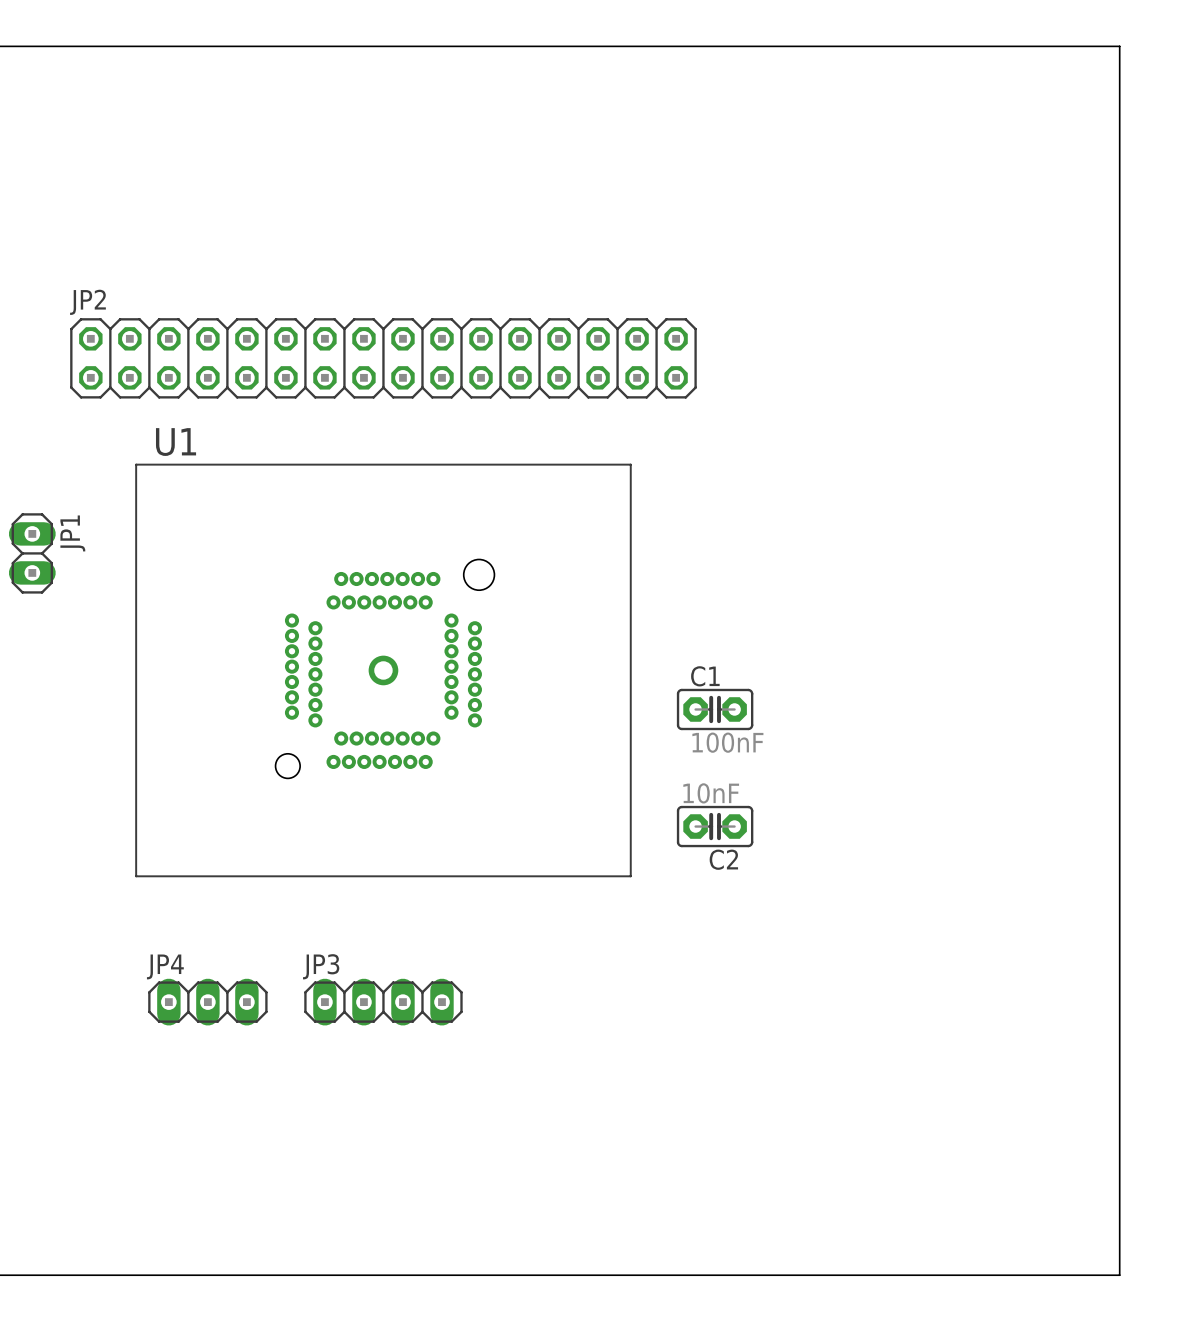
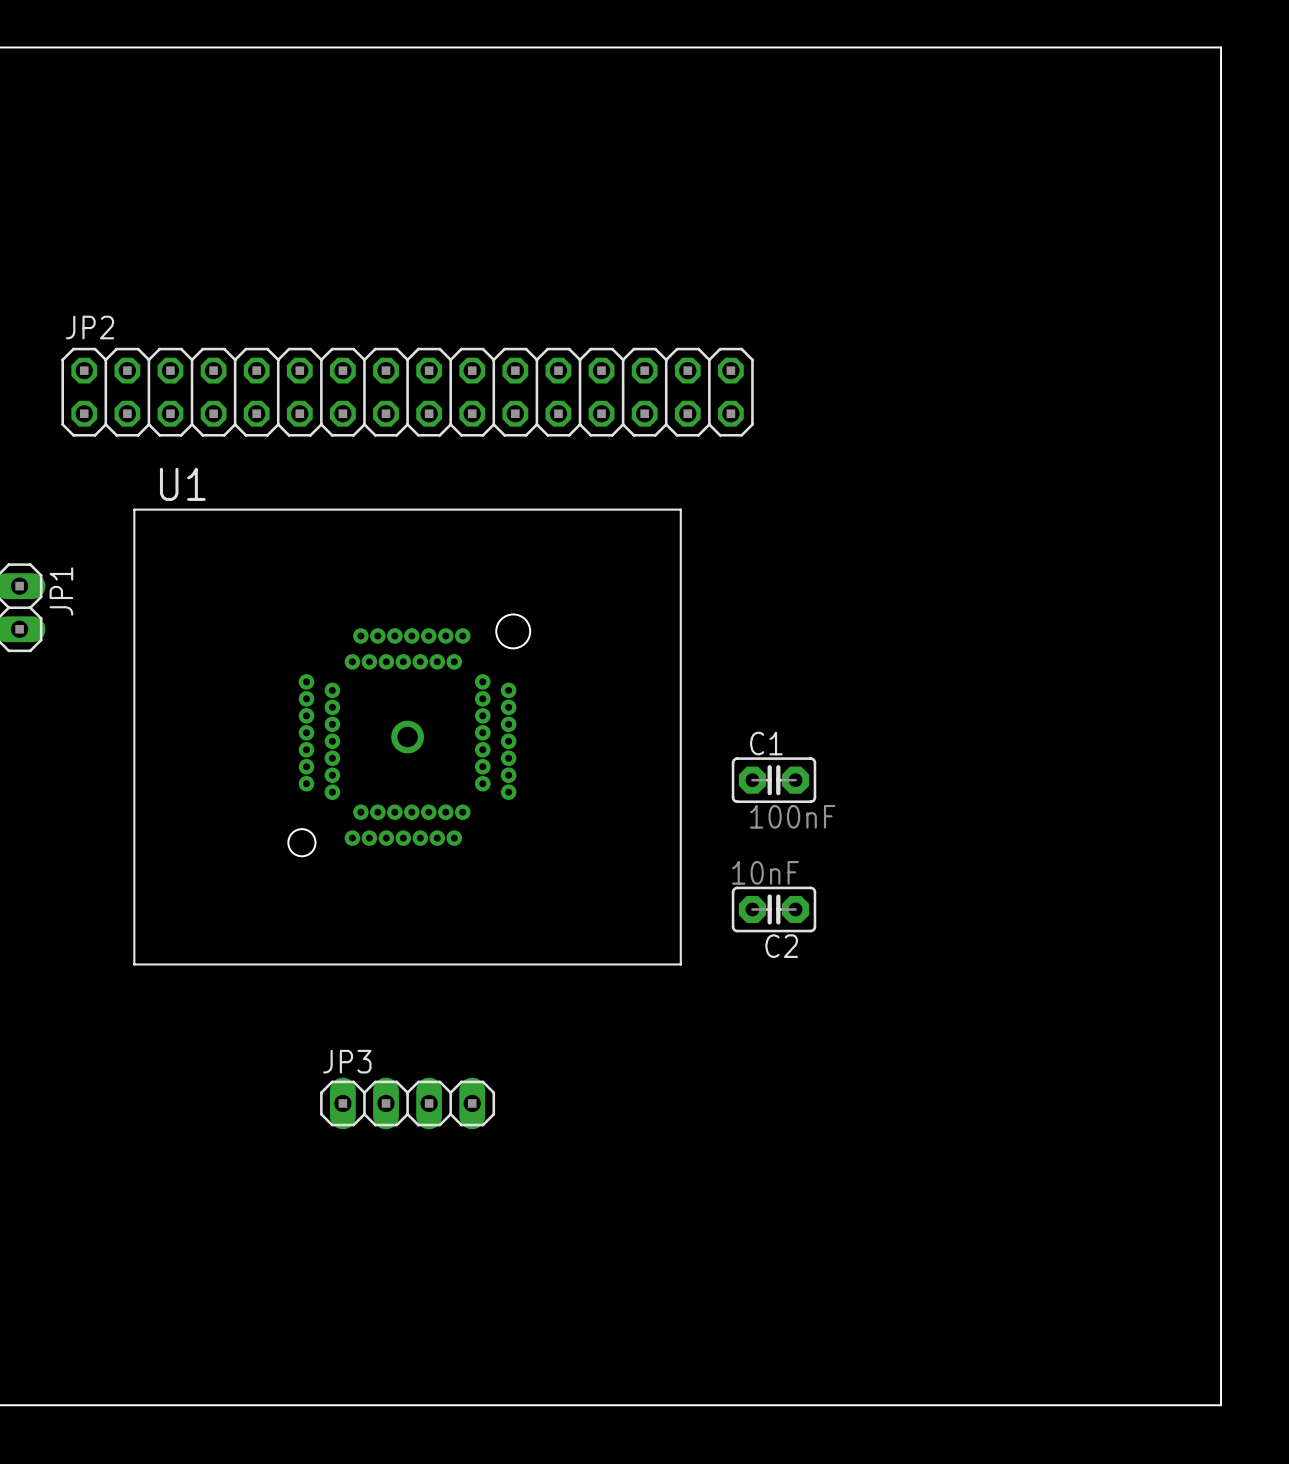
JP4: (207, 1002) -> none

